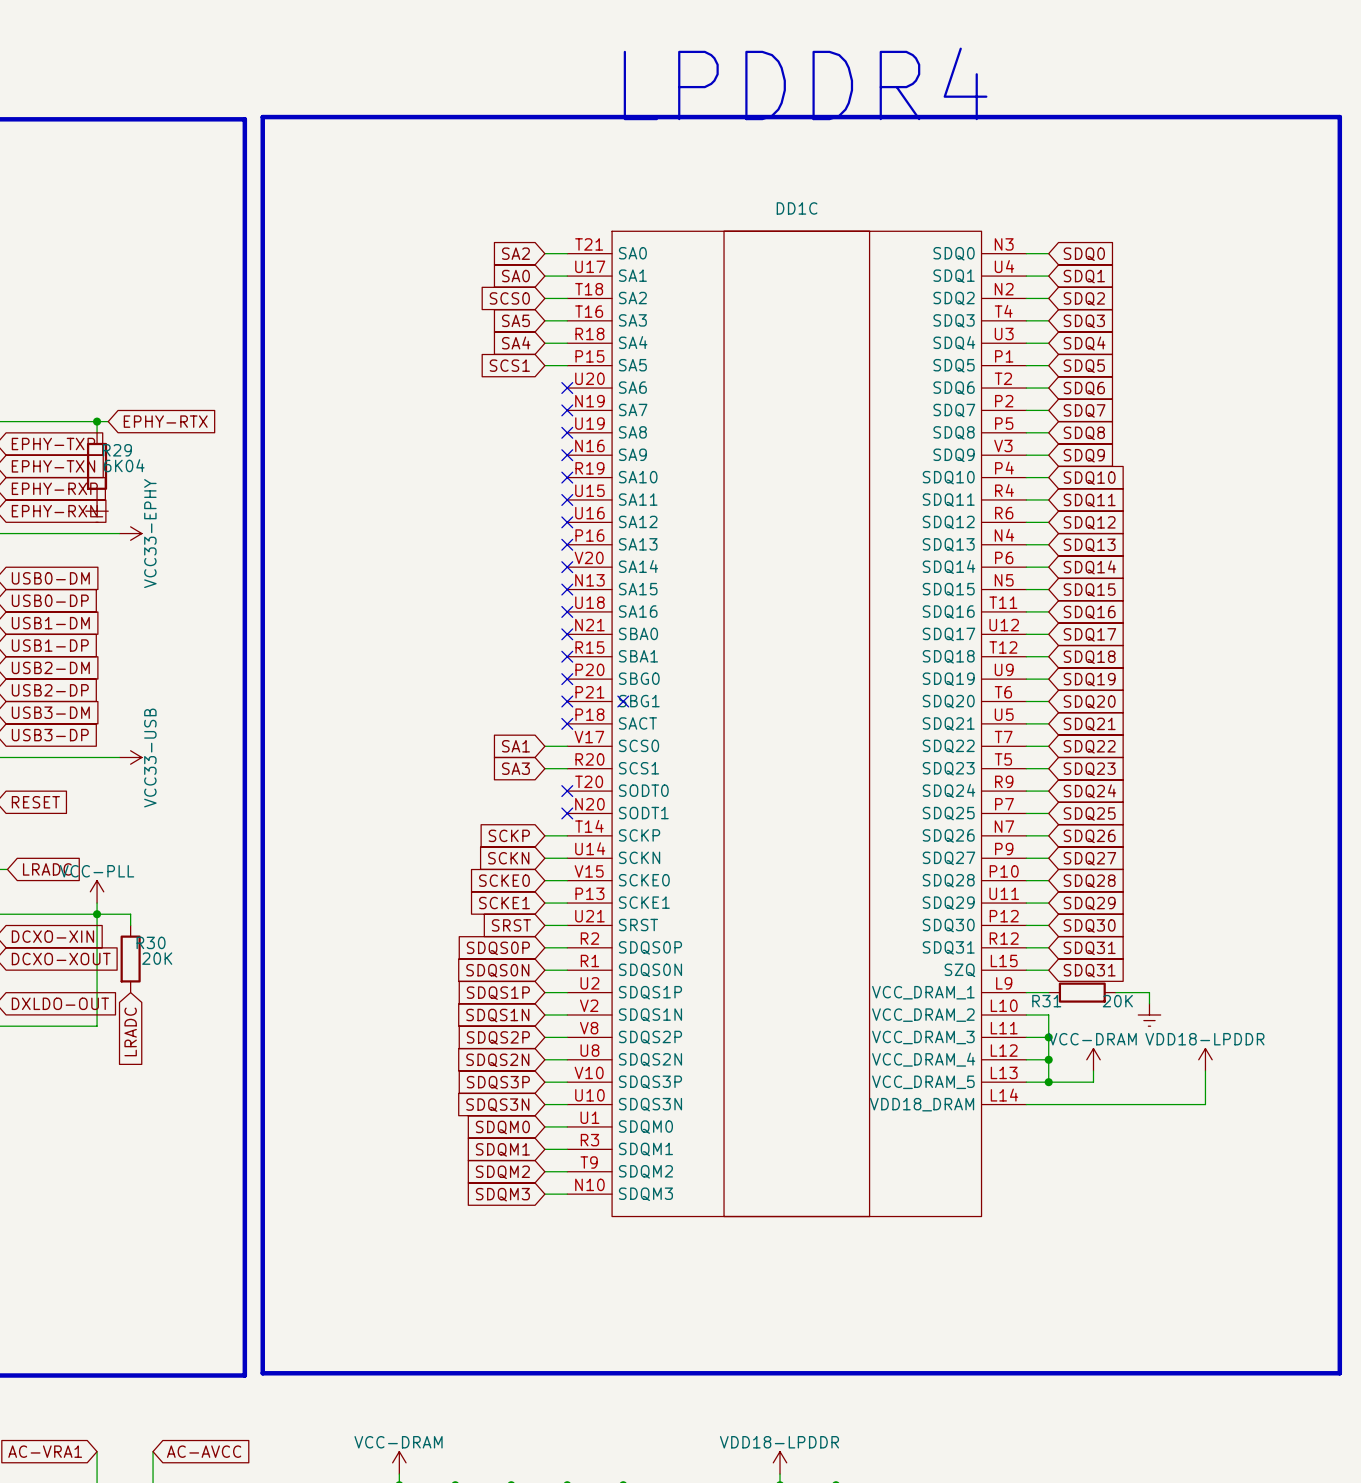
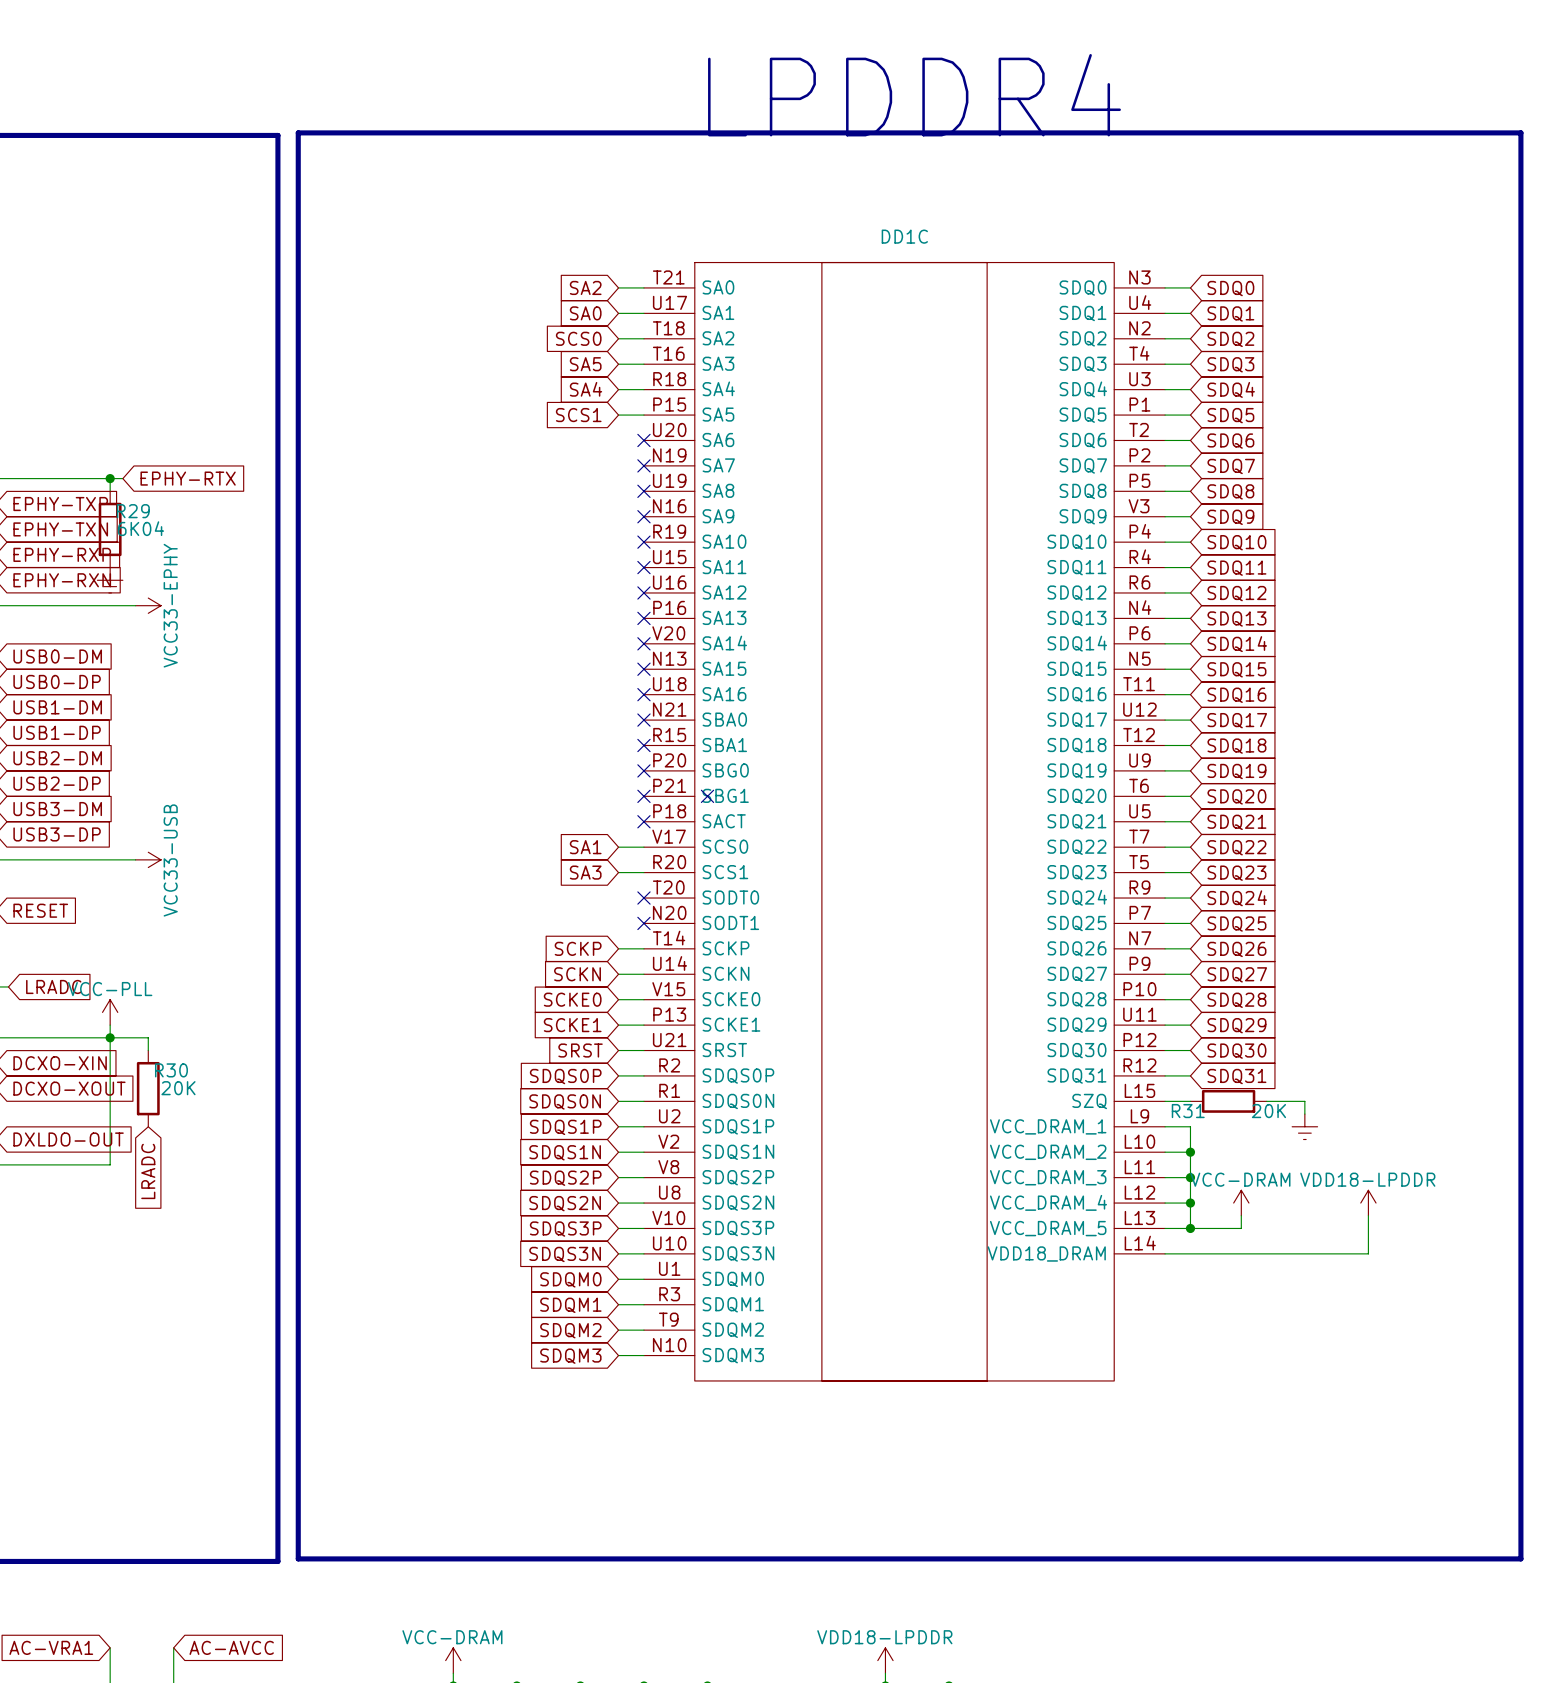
global label: SDQ31 (1089, 970) -> none
wire: none -> (1190, 1126) (1190, 1152)
R31 position: (1082, 992) -> (1228, 1101)
wire: (1115, 992) (1149, 992) (1149, 1003) -> (1266, 1101) (1304, 1101) (1304, 1114)
junction: none -> (1190, 1152)
power symbol position: (1149, 1014) -> (1304, 1126)

